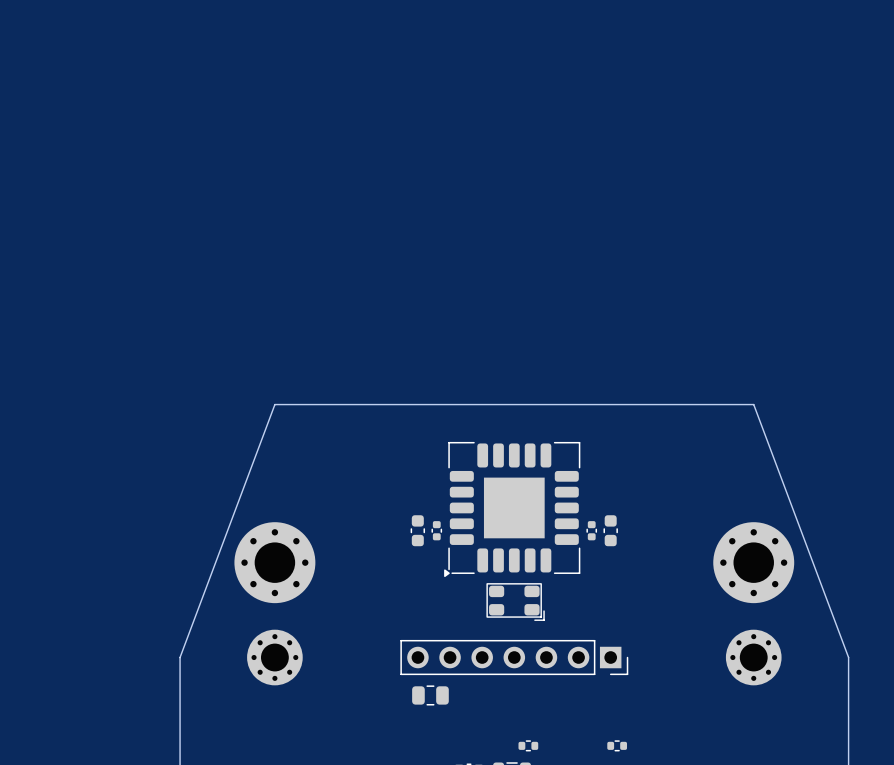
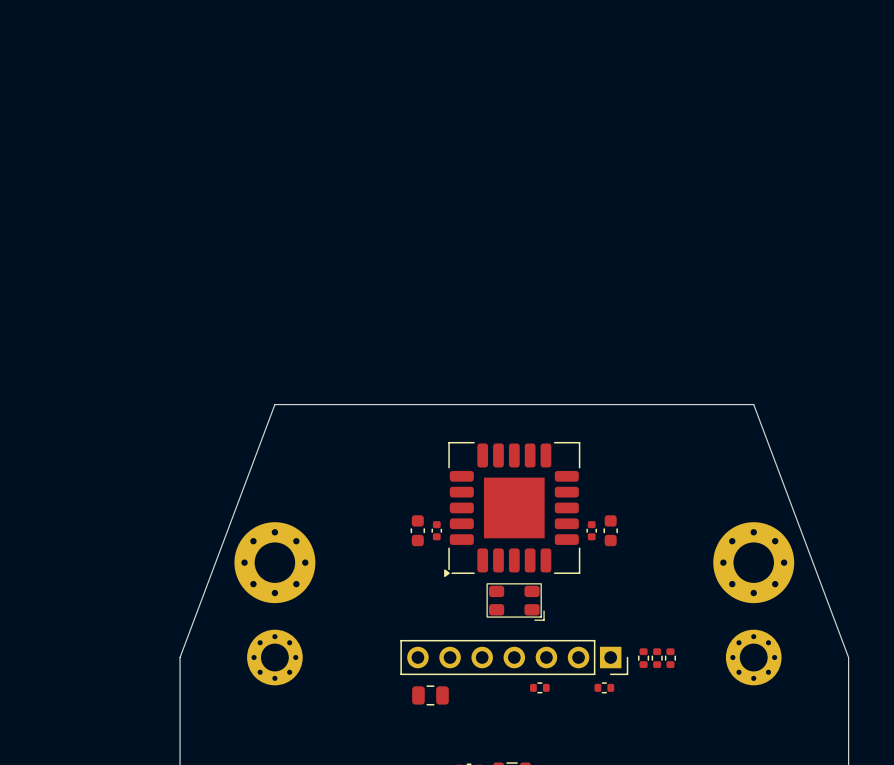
part: none -> (643, 658)
part: none -> (657, 658)
part: none -> (670, 658)
part: none -> (539, 687)
part: none -> (604, 687)
part: (528, 745) -> none
part: (617, 745) -> none

